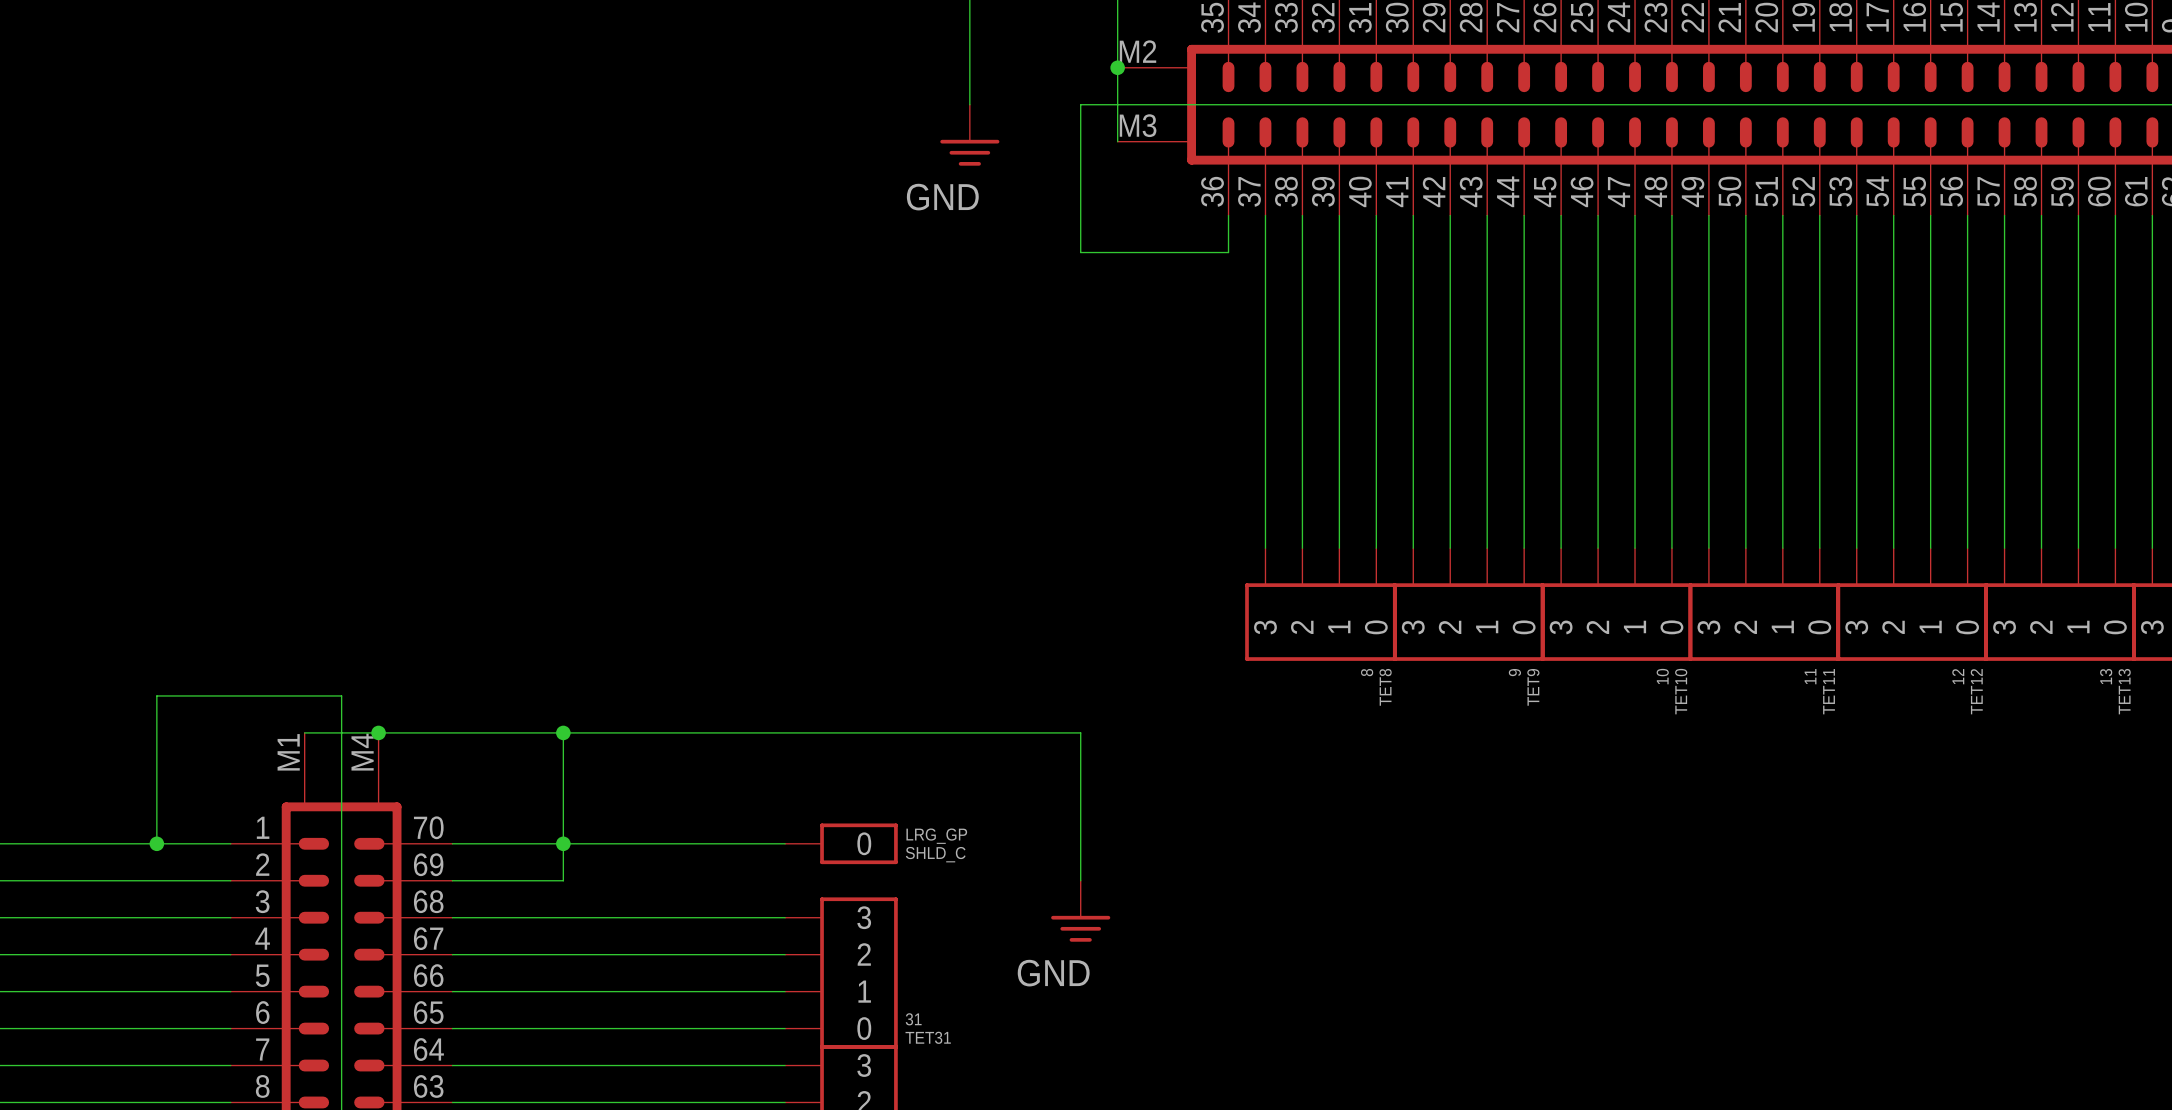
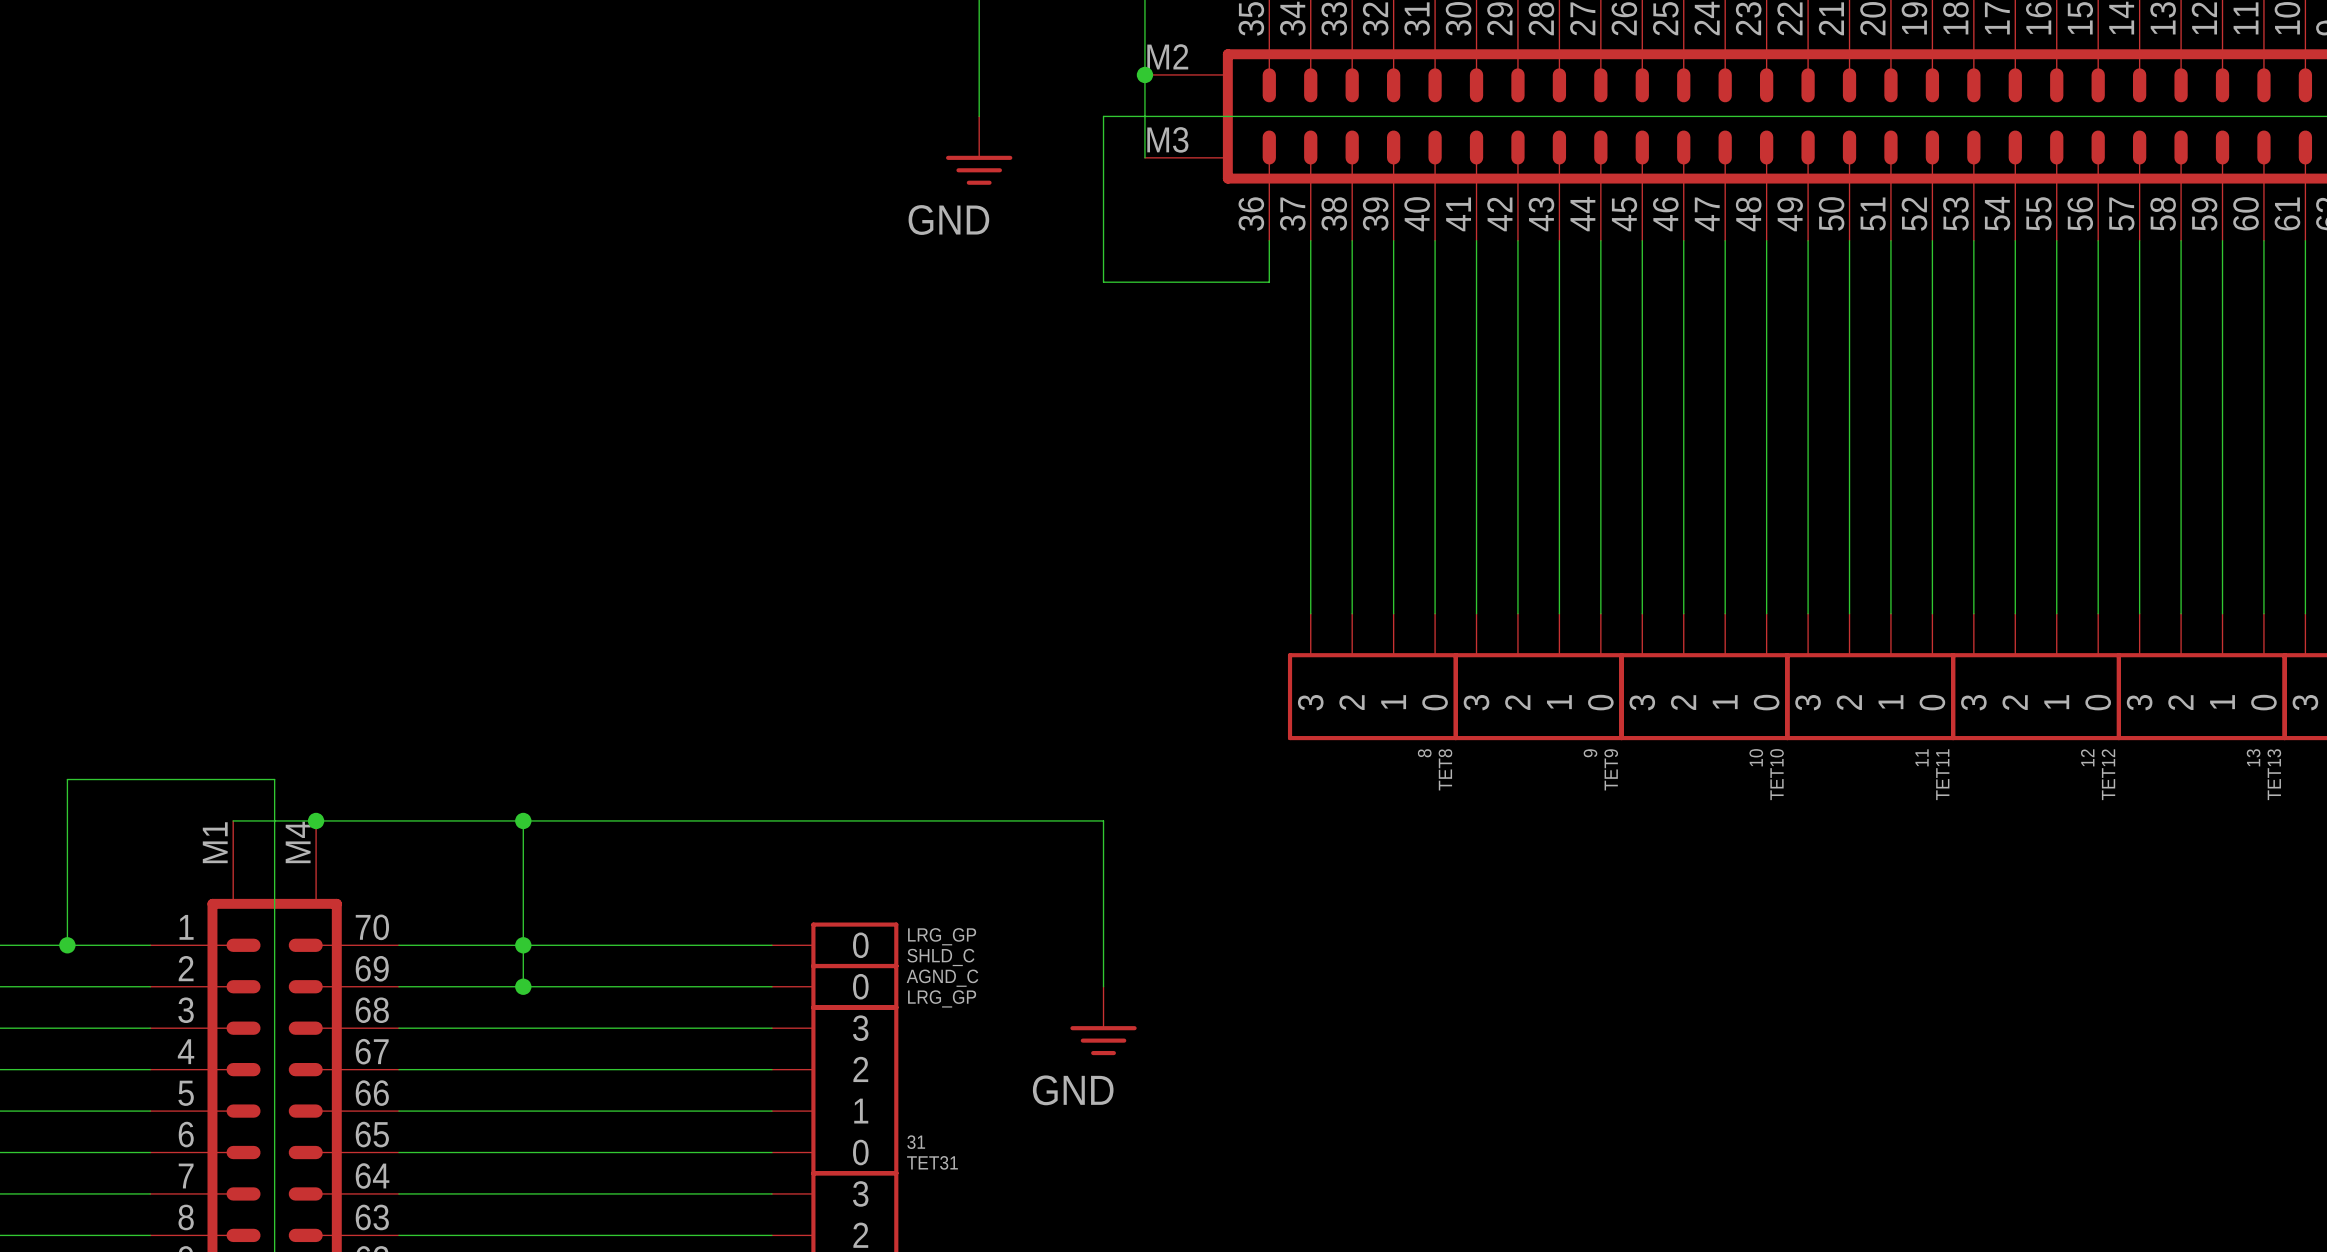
wire: none -> (523, 986) (771, 986)
junction: none -> (523, 986)
AGND_C: none -> LRG_GP (835, 986)

